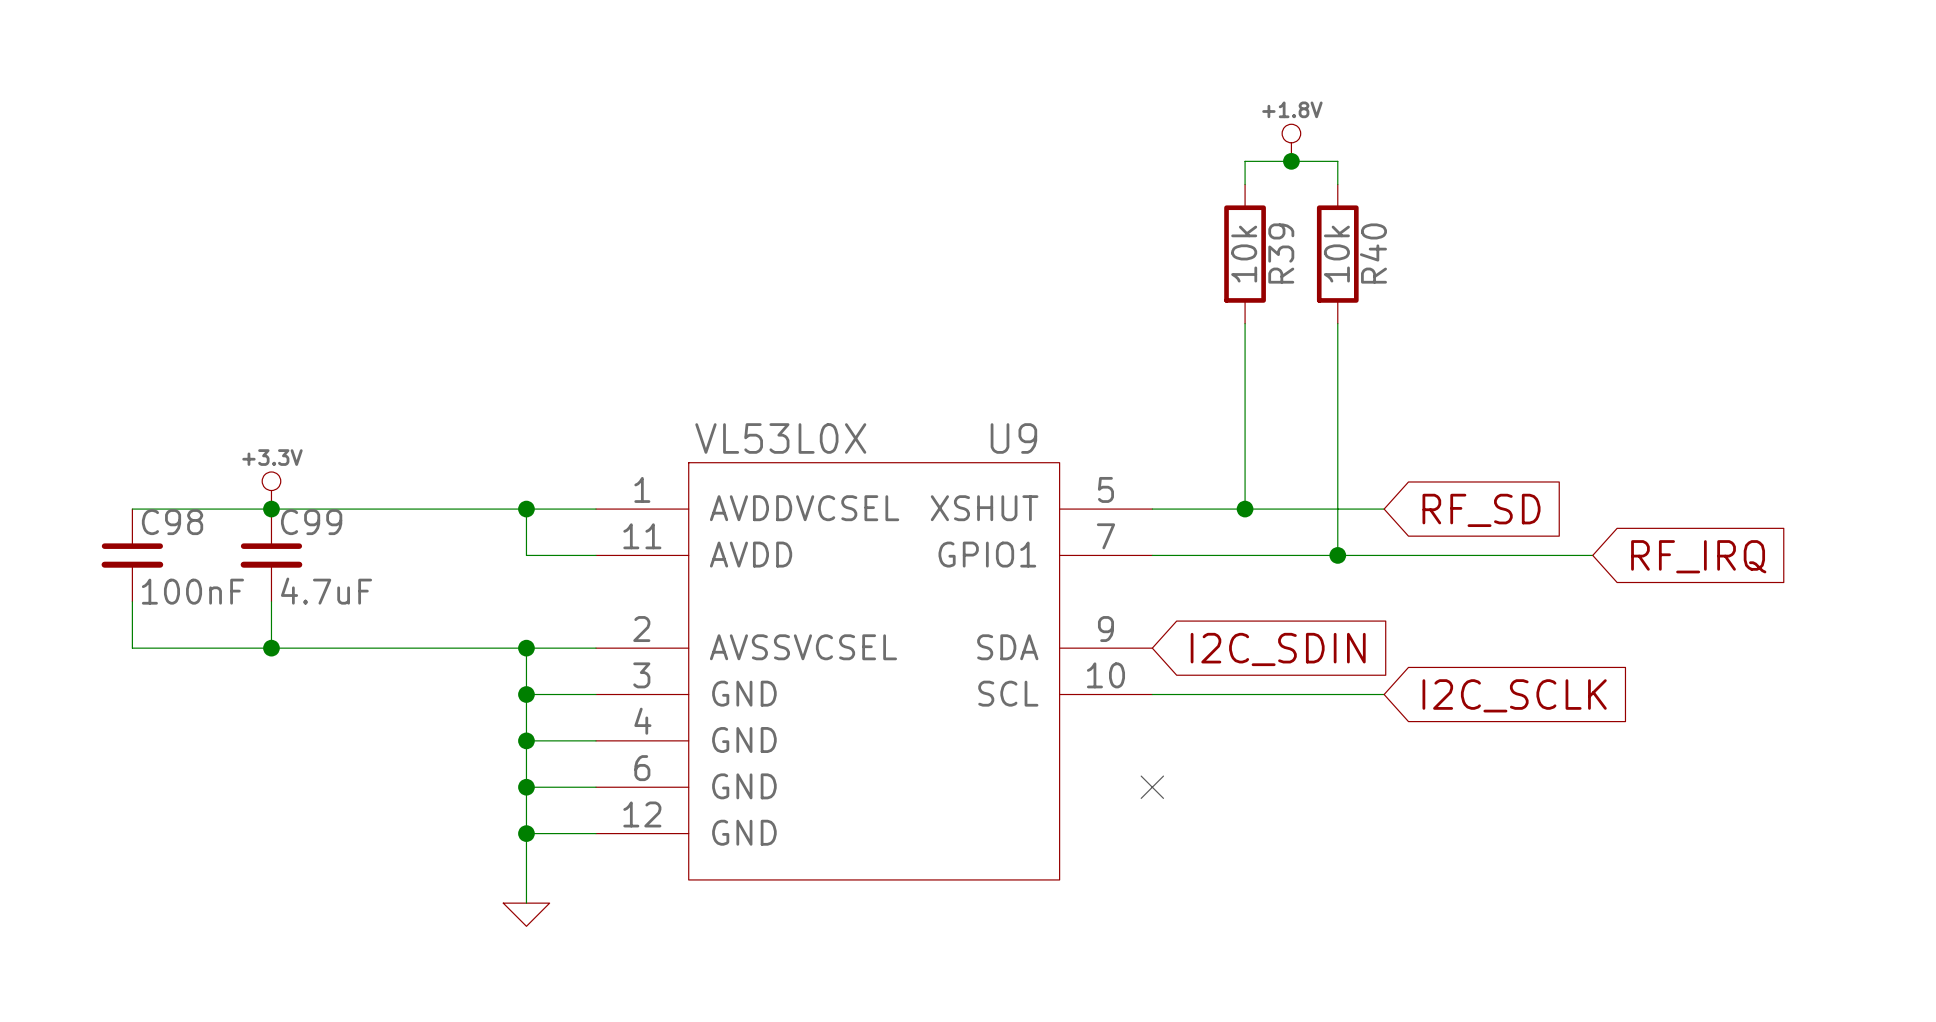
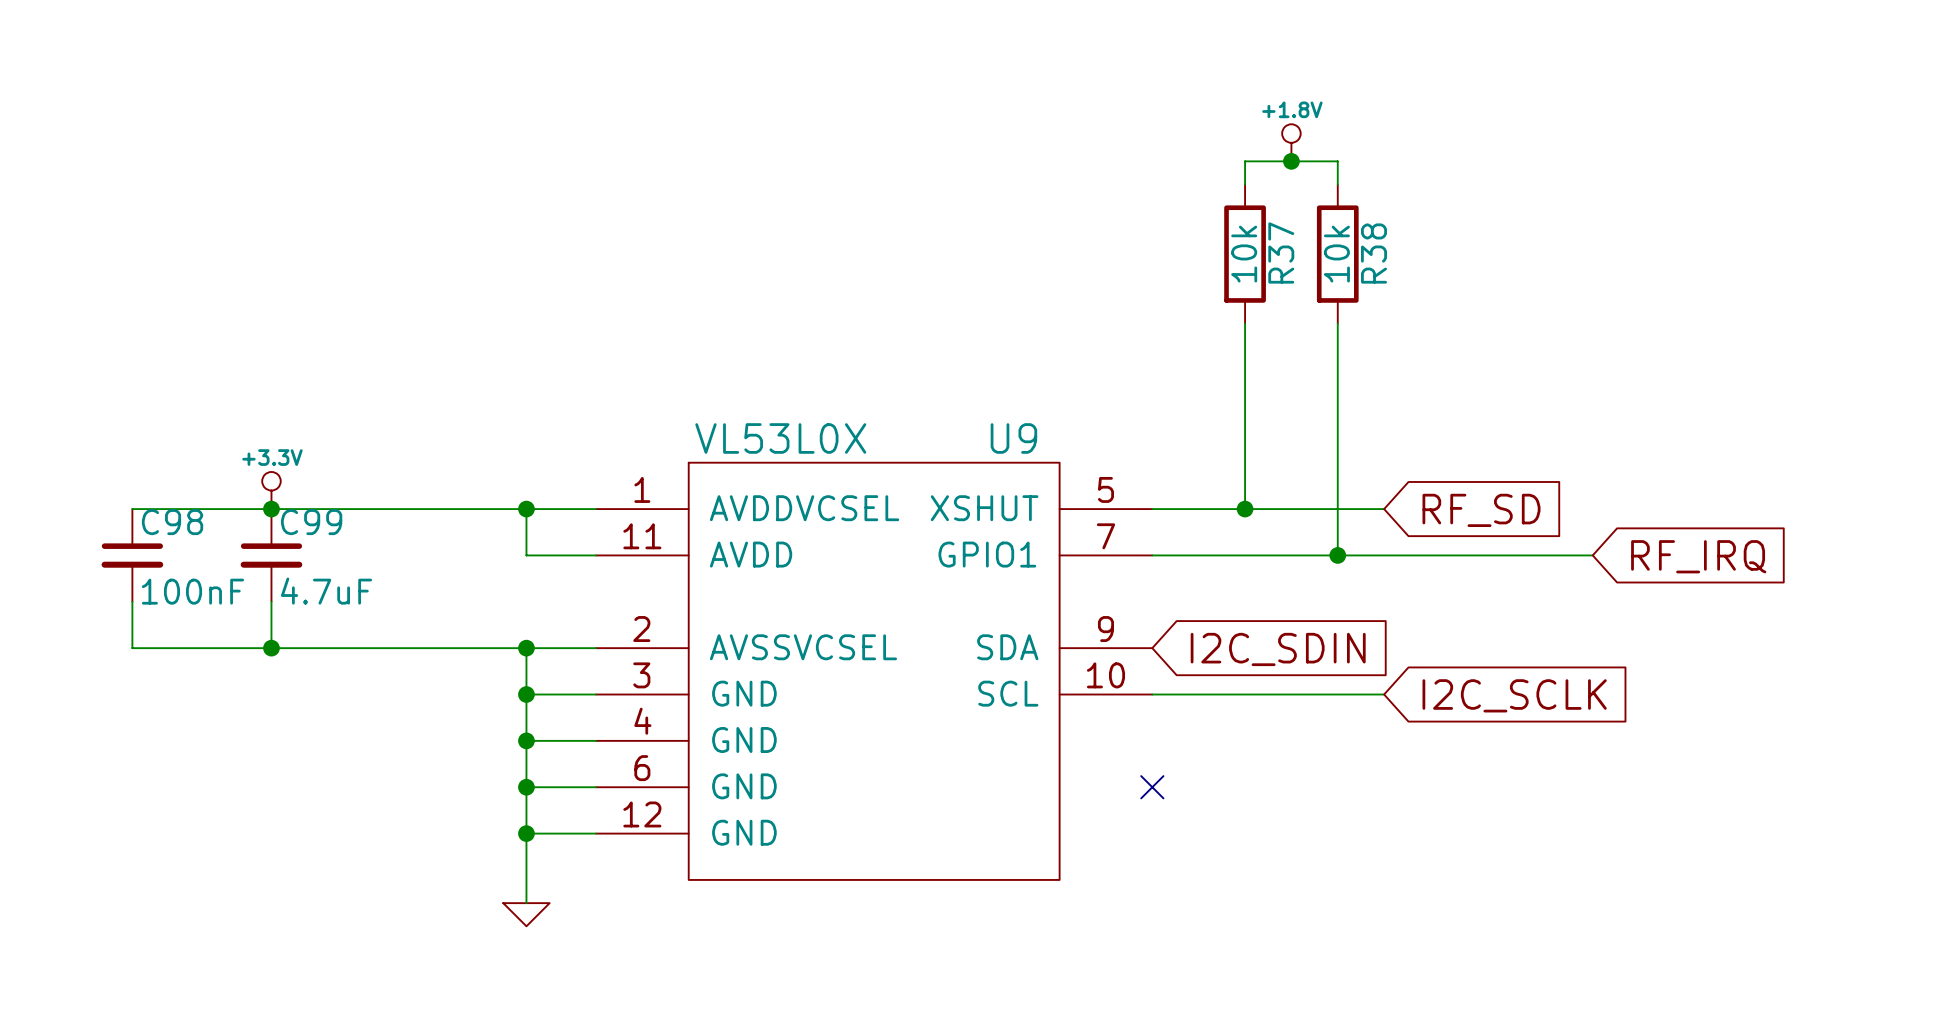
R39 name: R39 (1281, 253) -> R37 (1281, 252)
R40 name: R40 (1373, 253) -> R38 (1374, 253)

